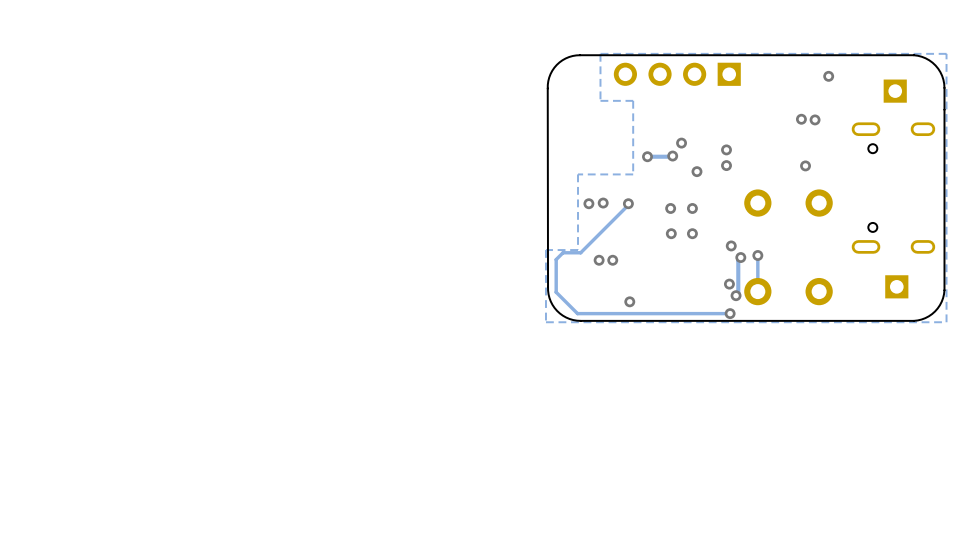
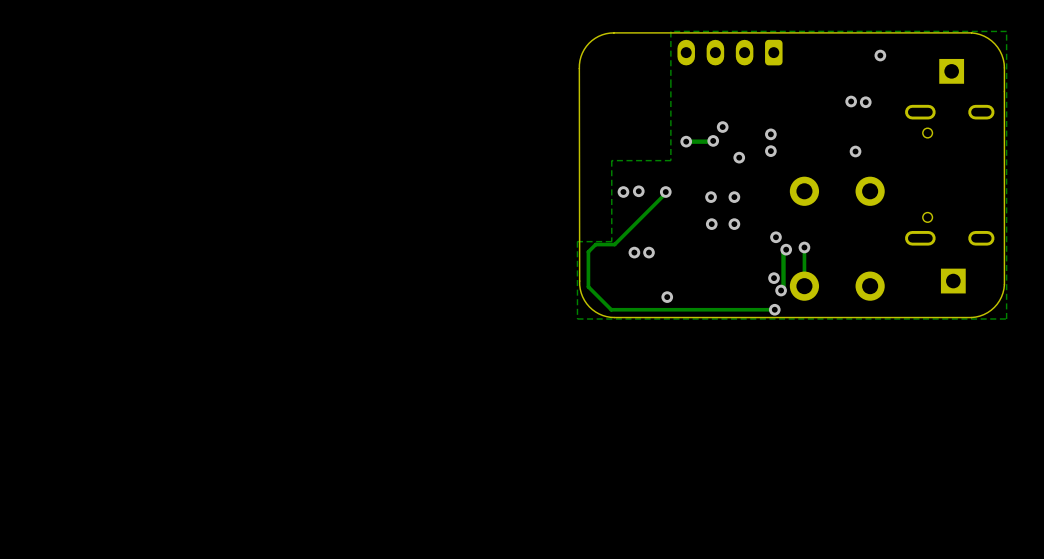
zone outline: (633, 53) (600, 53) (600, 100) (633, 100) -> (670, 31) (670, 81)
part footprint: [613, 62, 741, 86] -> [677, 39, 783, 66]

